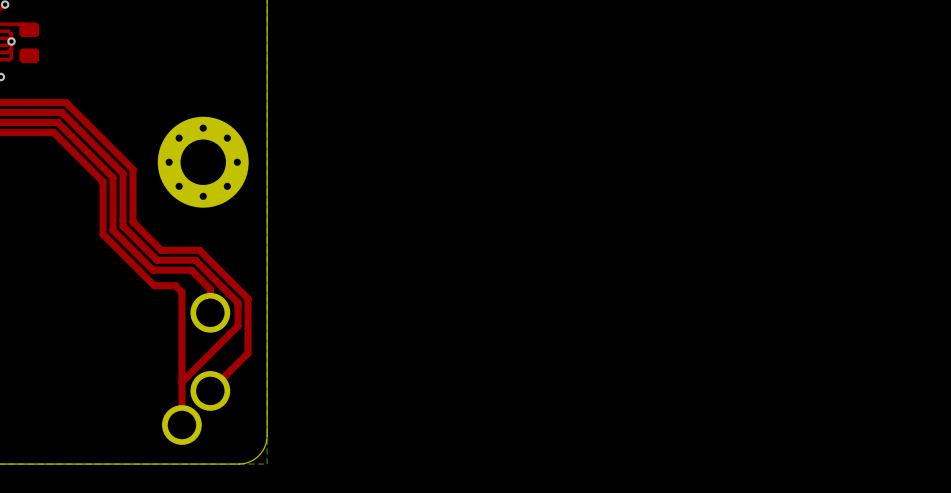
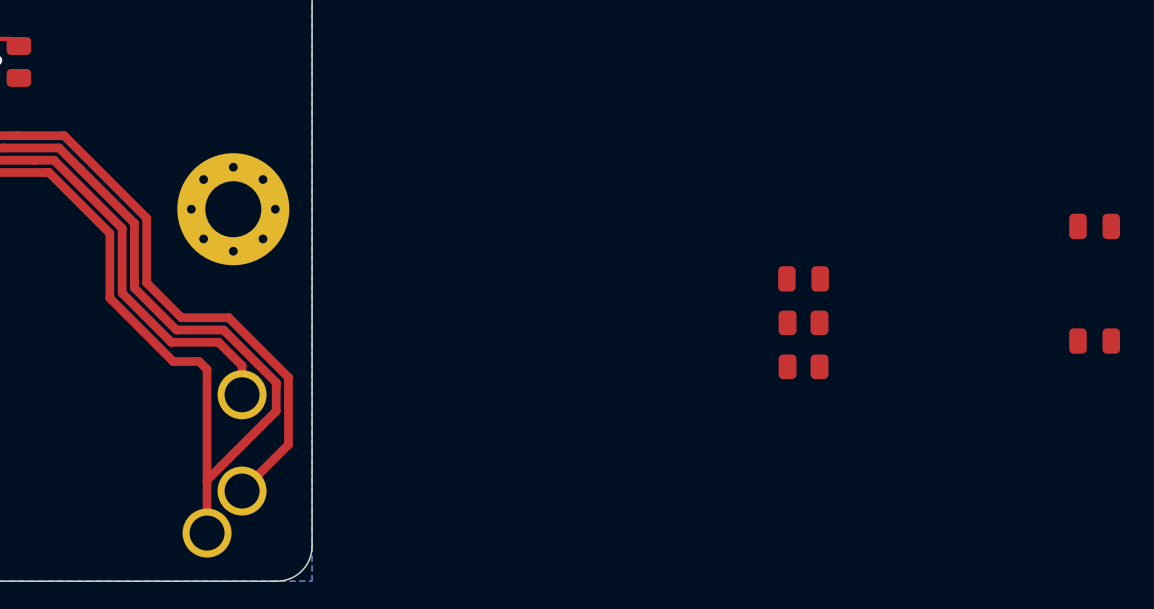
part: none -> (1094, 226)
part: none -> (803, 278)
part: none -> (803, 322)
part: none -> (1094, 341)
part: none -> (803, 366)

